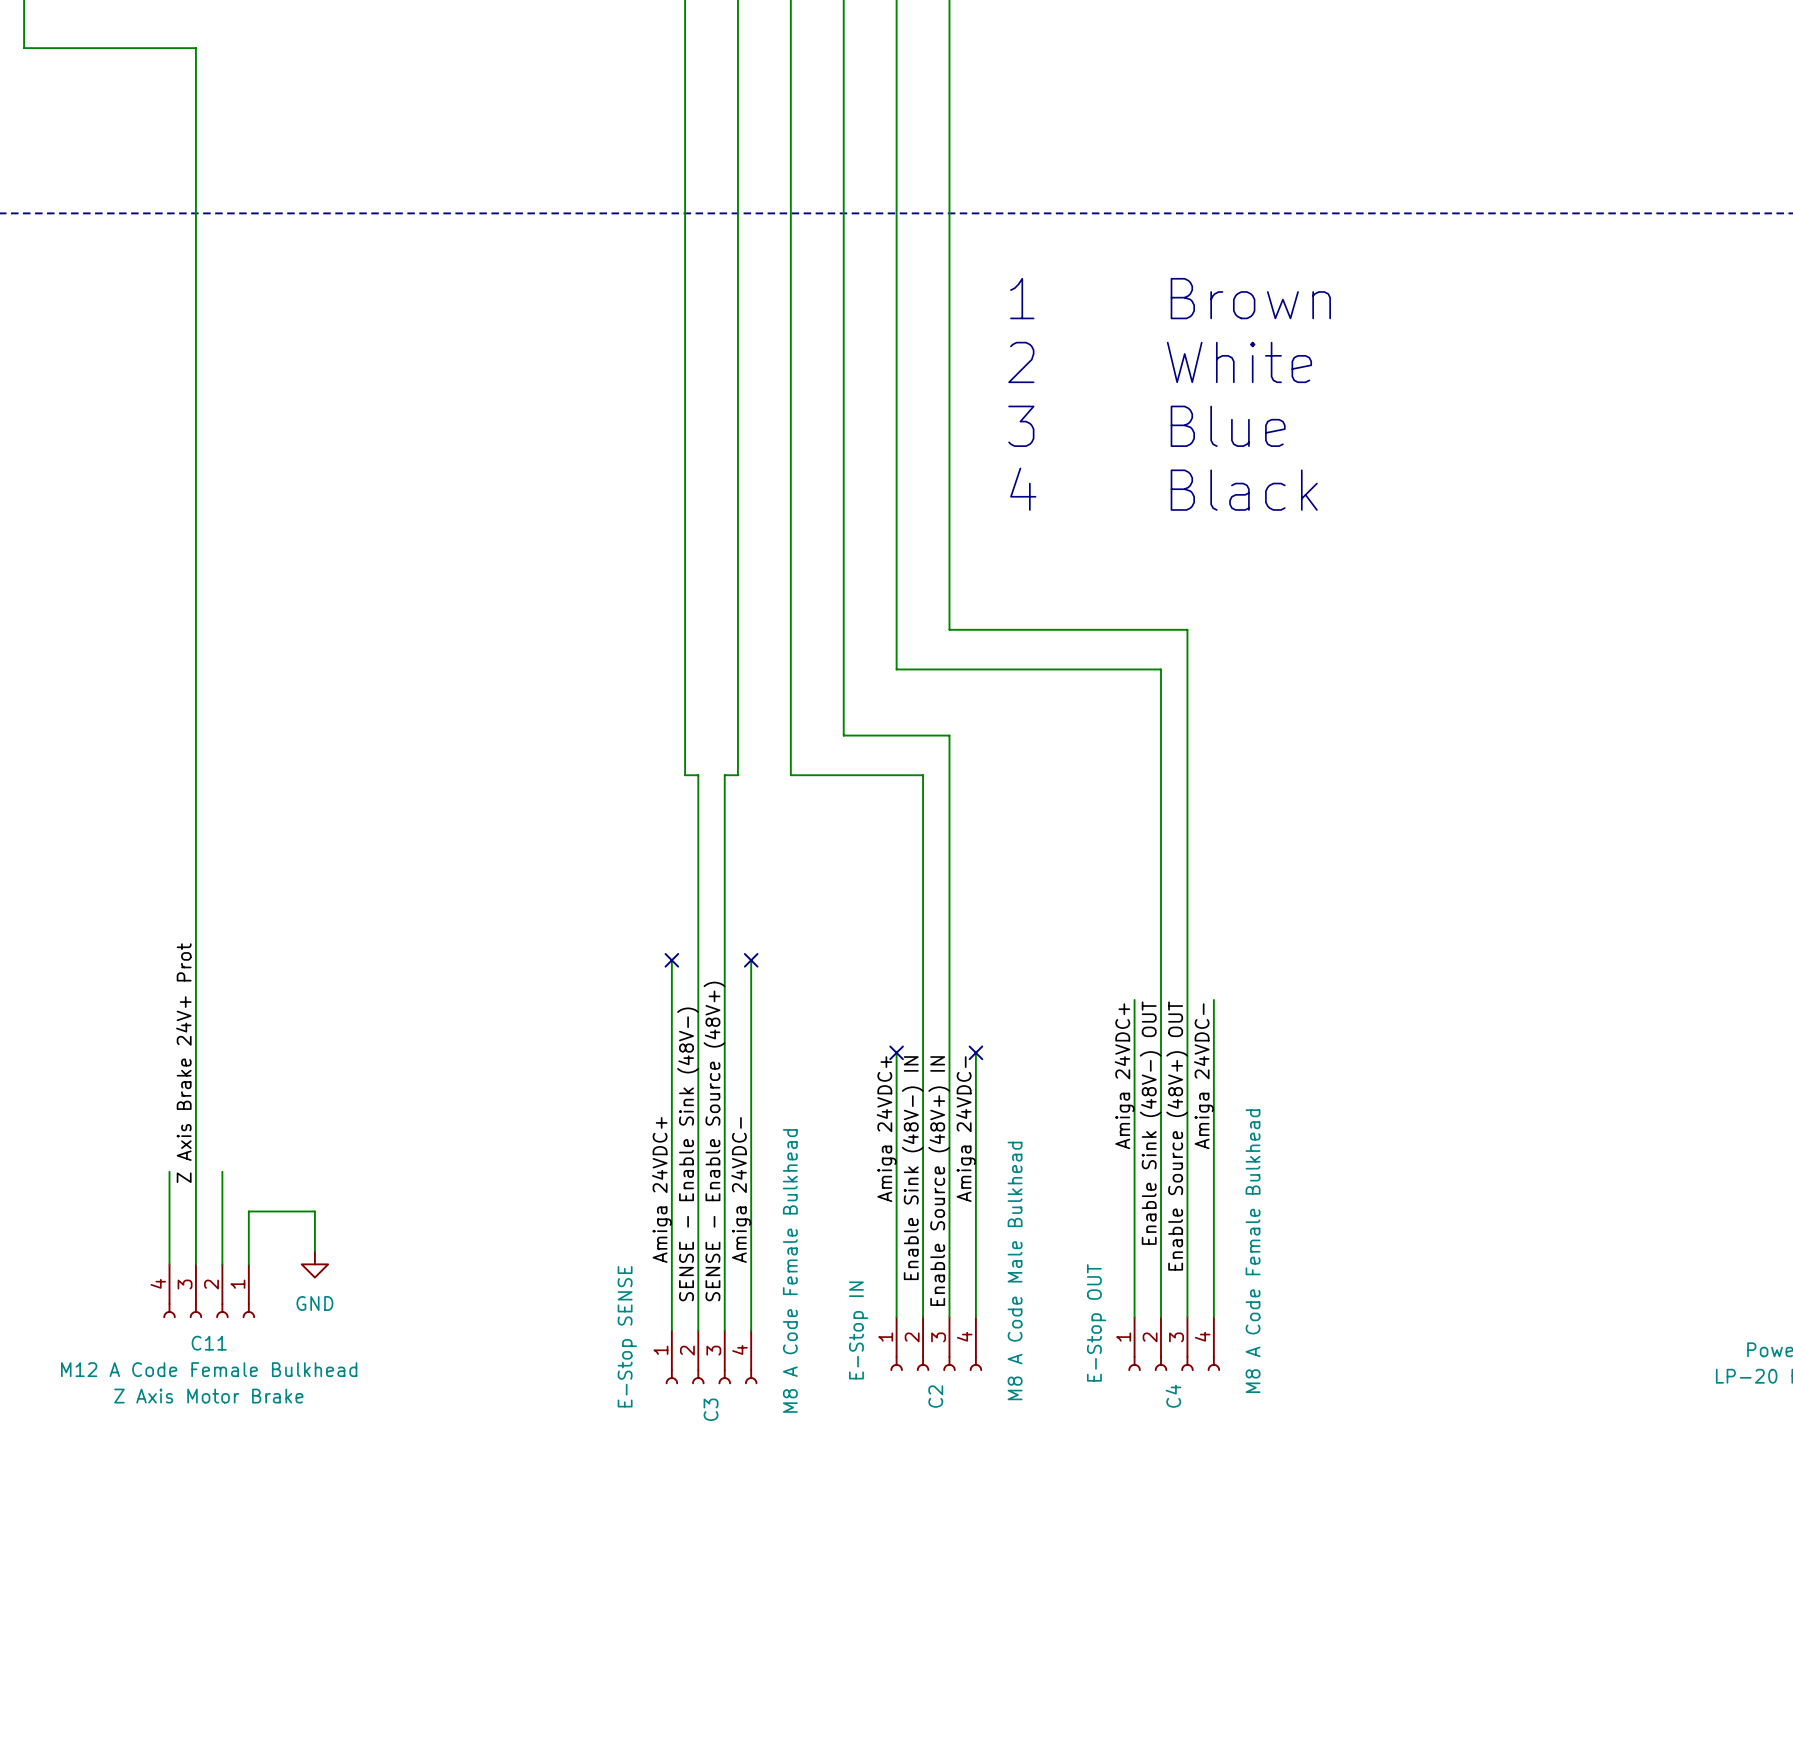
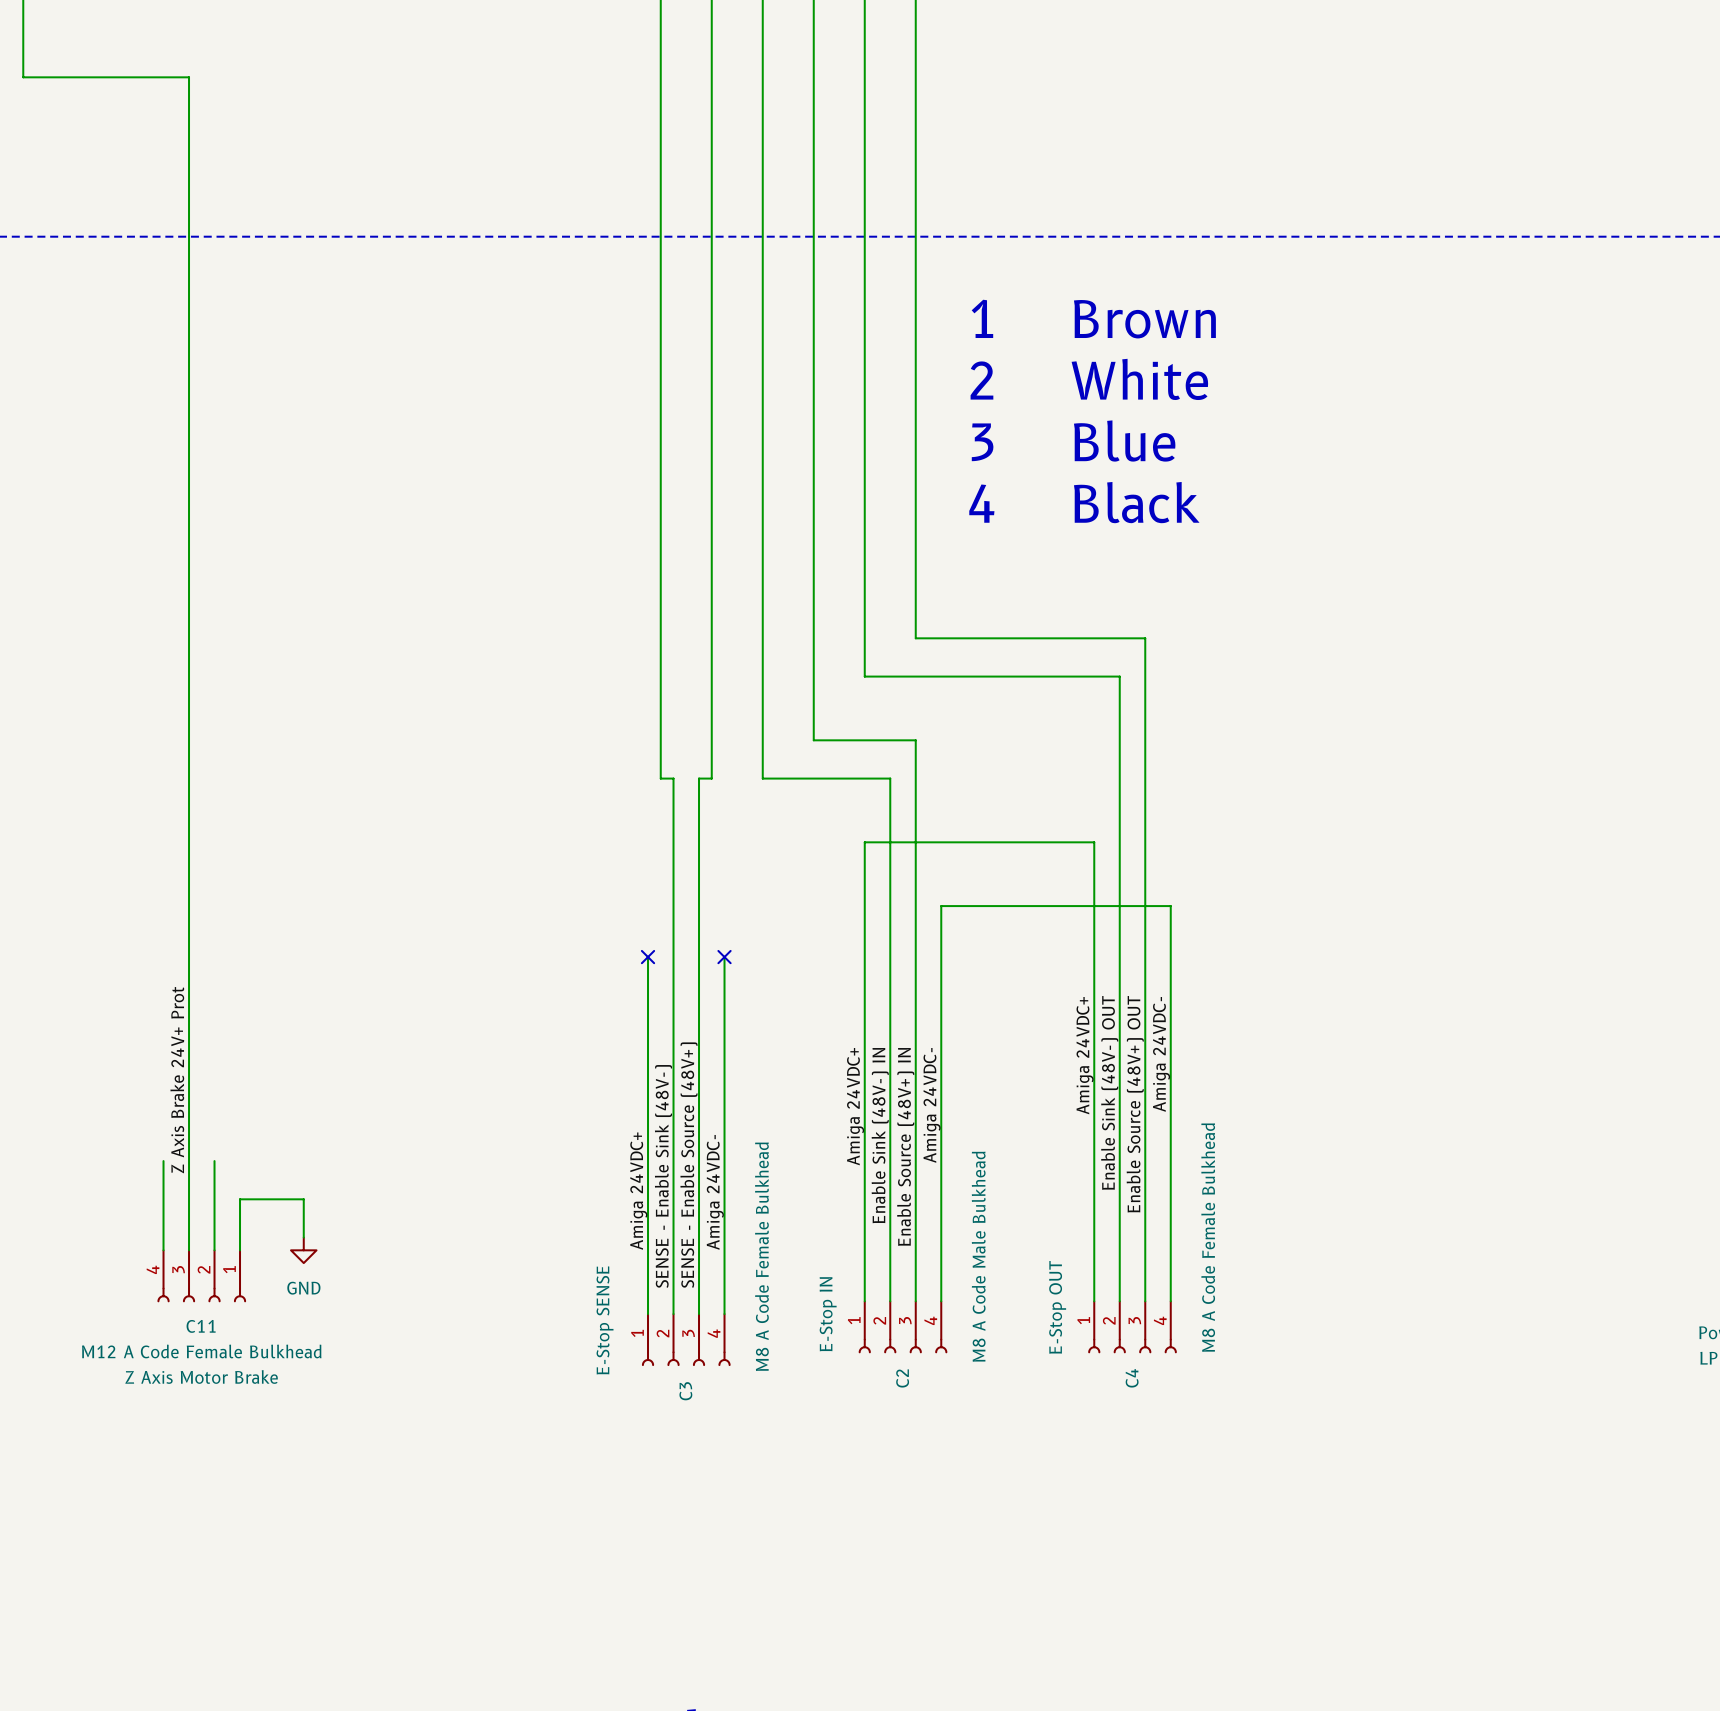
wire: none -> (1094, 995) (1094, 842) (864, 842) (864, 1046)
wire: none -> (1170, 995) (1170, 906) (941, 906) (941, 1046)
no-connect mark: (896, 1052) -> none
no-connect mark: (975, 1052) -> none

